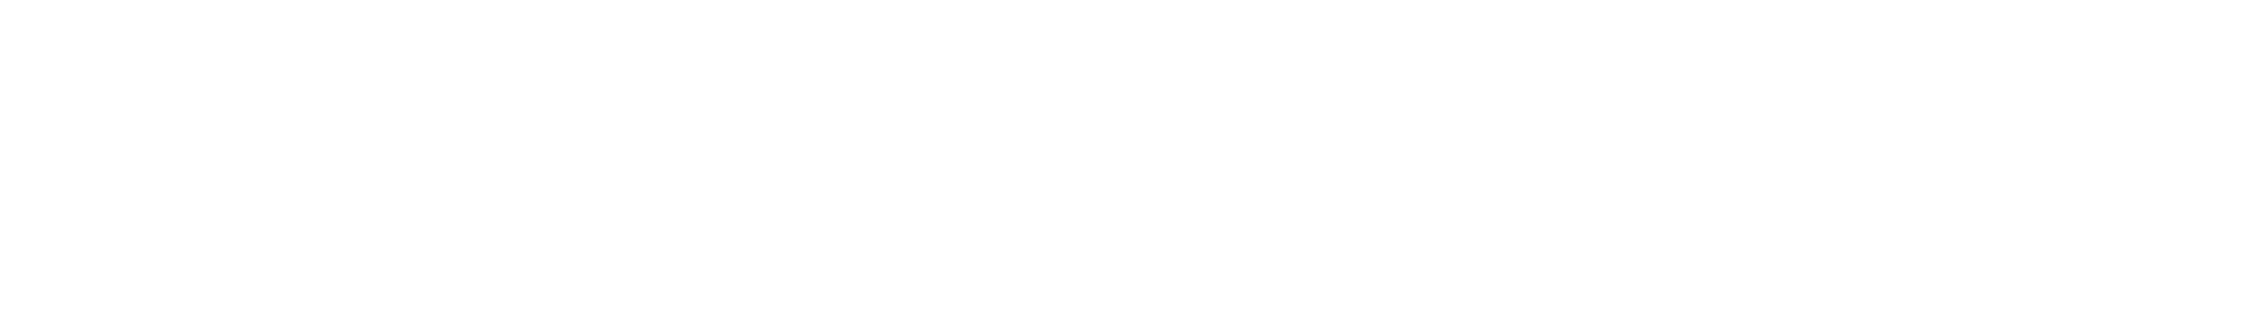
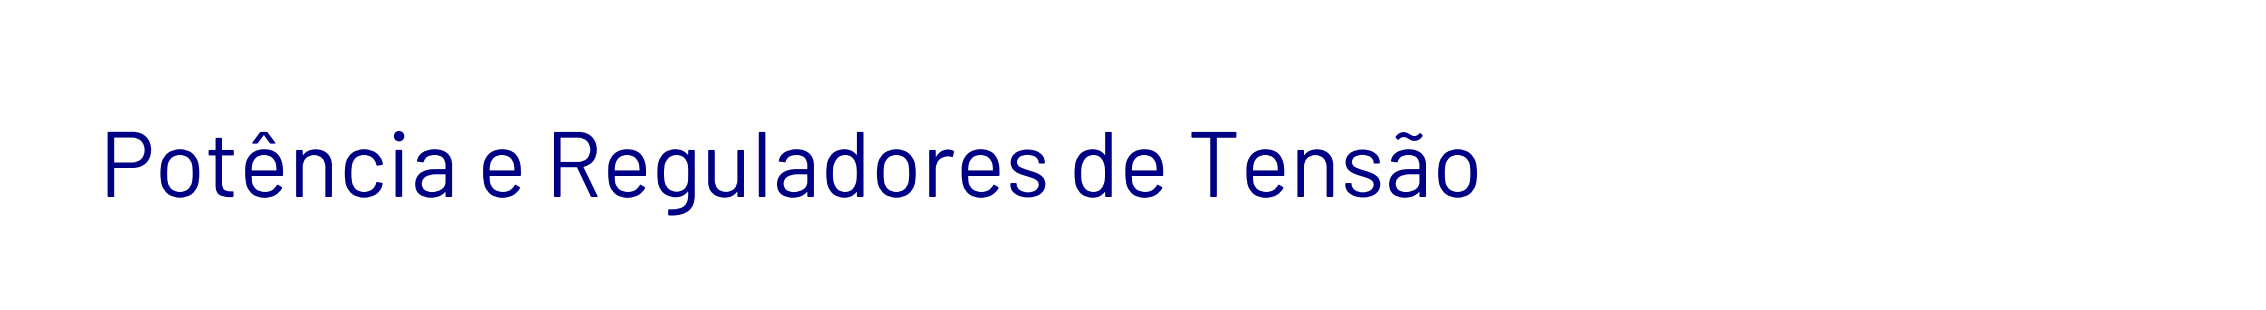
text: none -> Potência e Reguladores de Tensão (792, 173)

